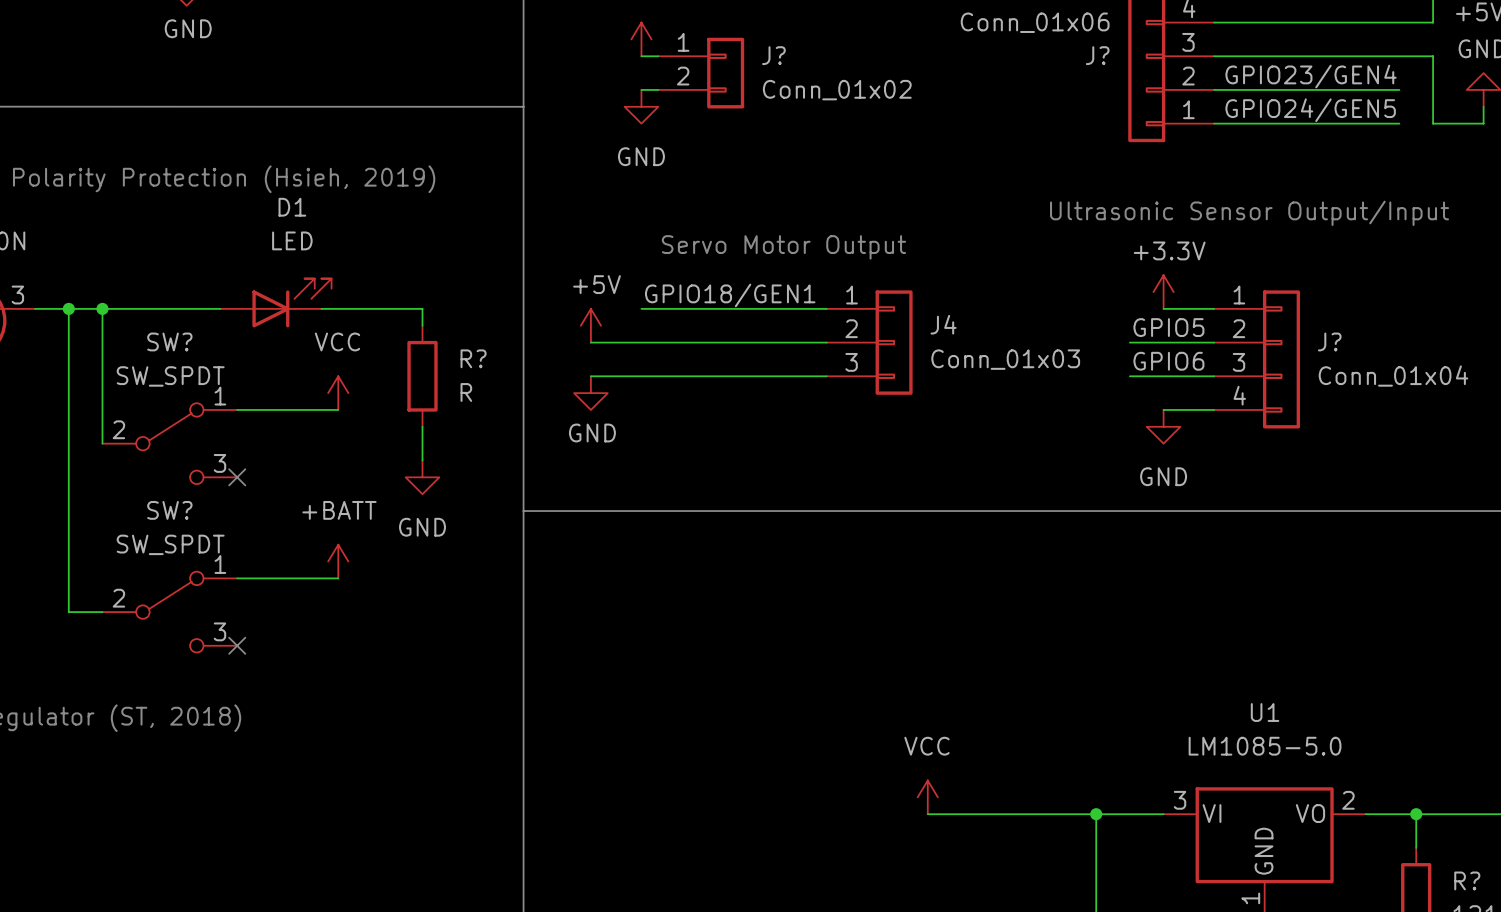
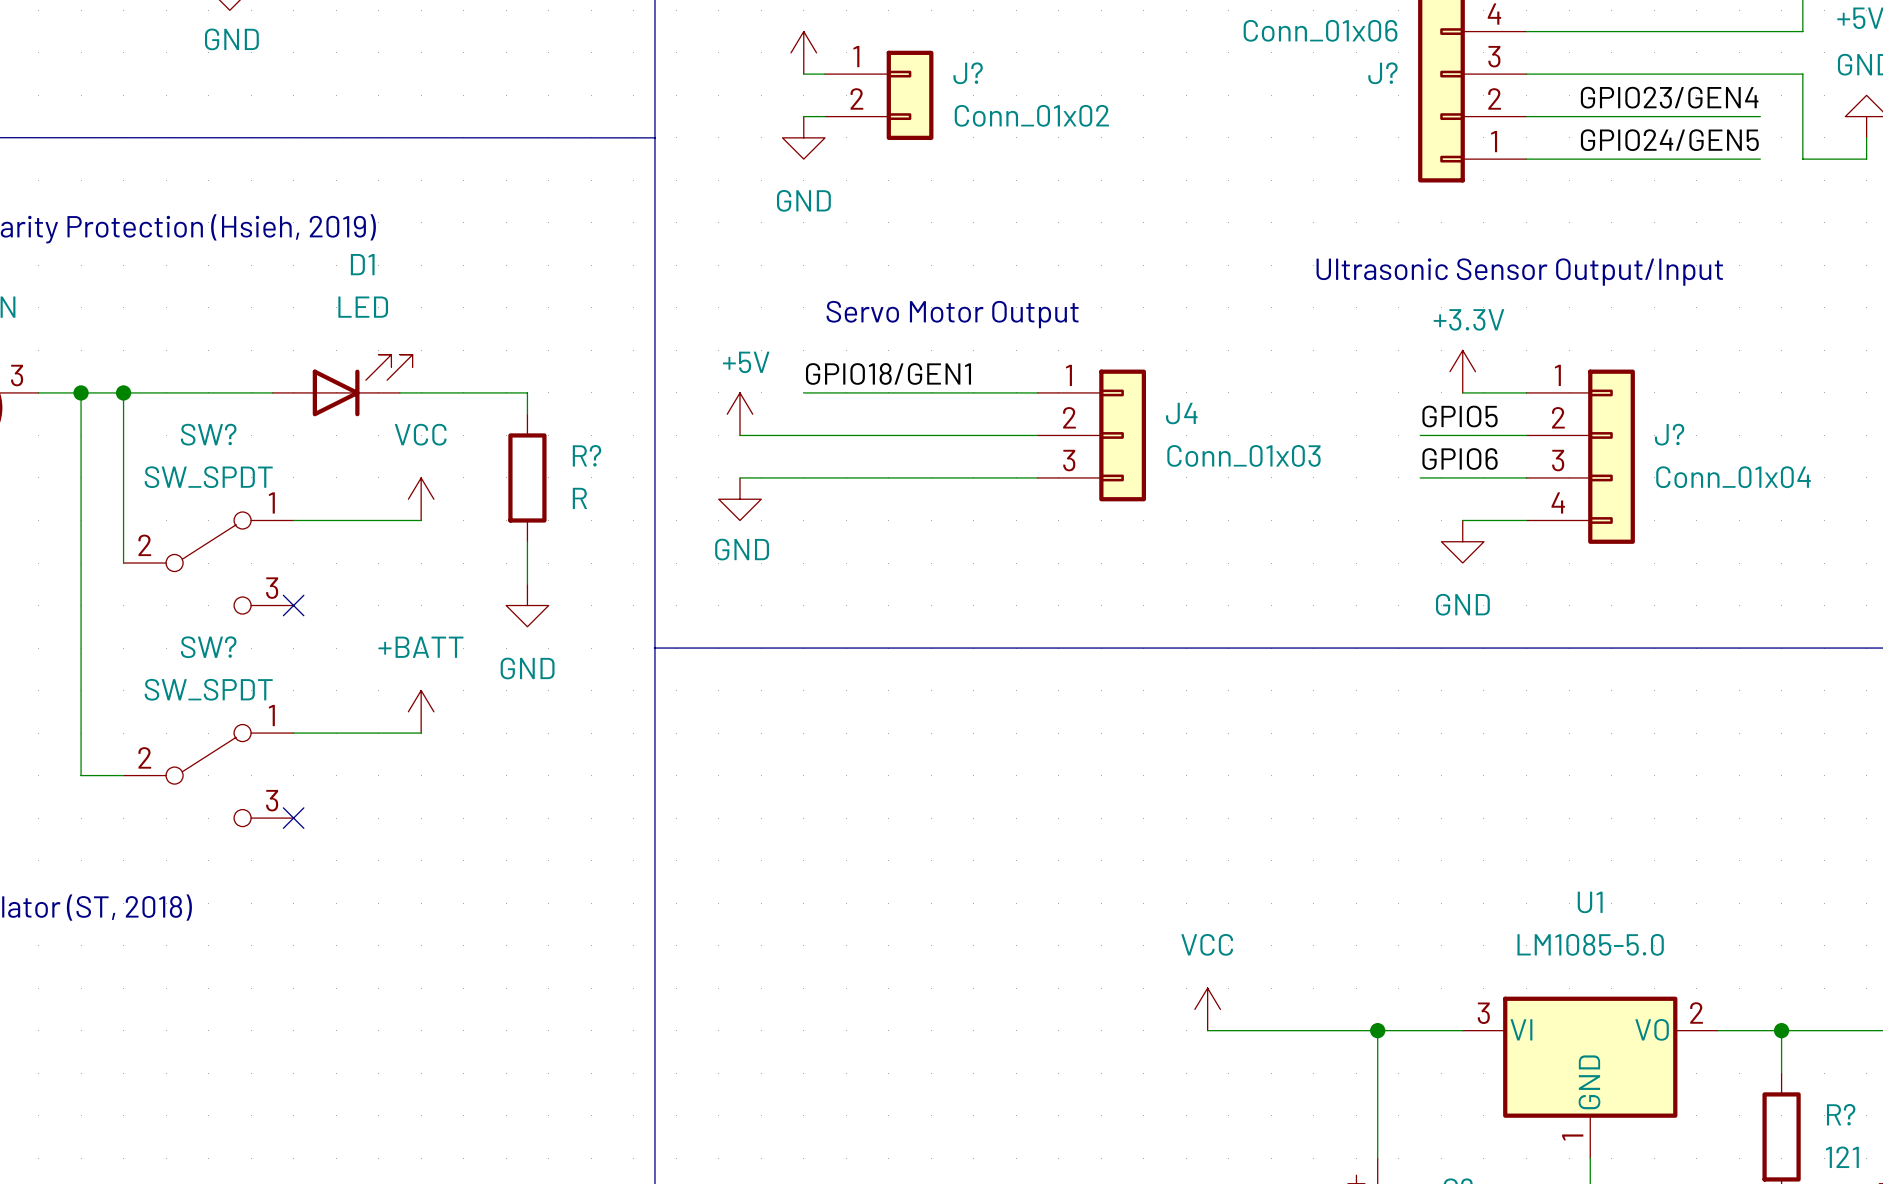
power symbol position: VCC (927, 797) -> VCC (1207, 1009)
wire: (927, 814) (961, 814) -> none

